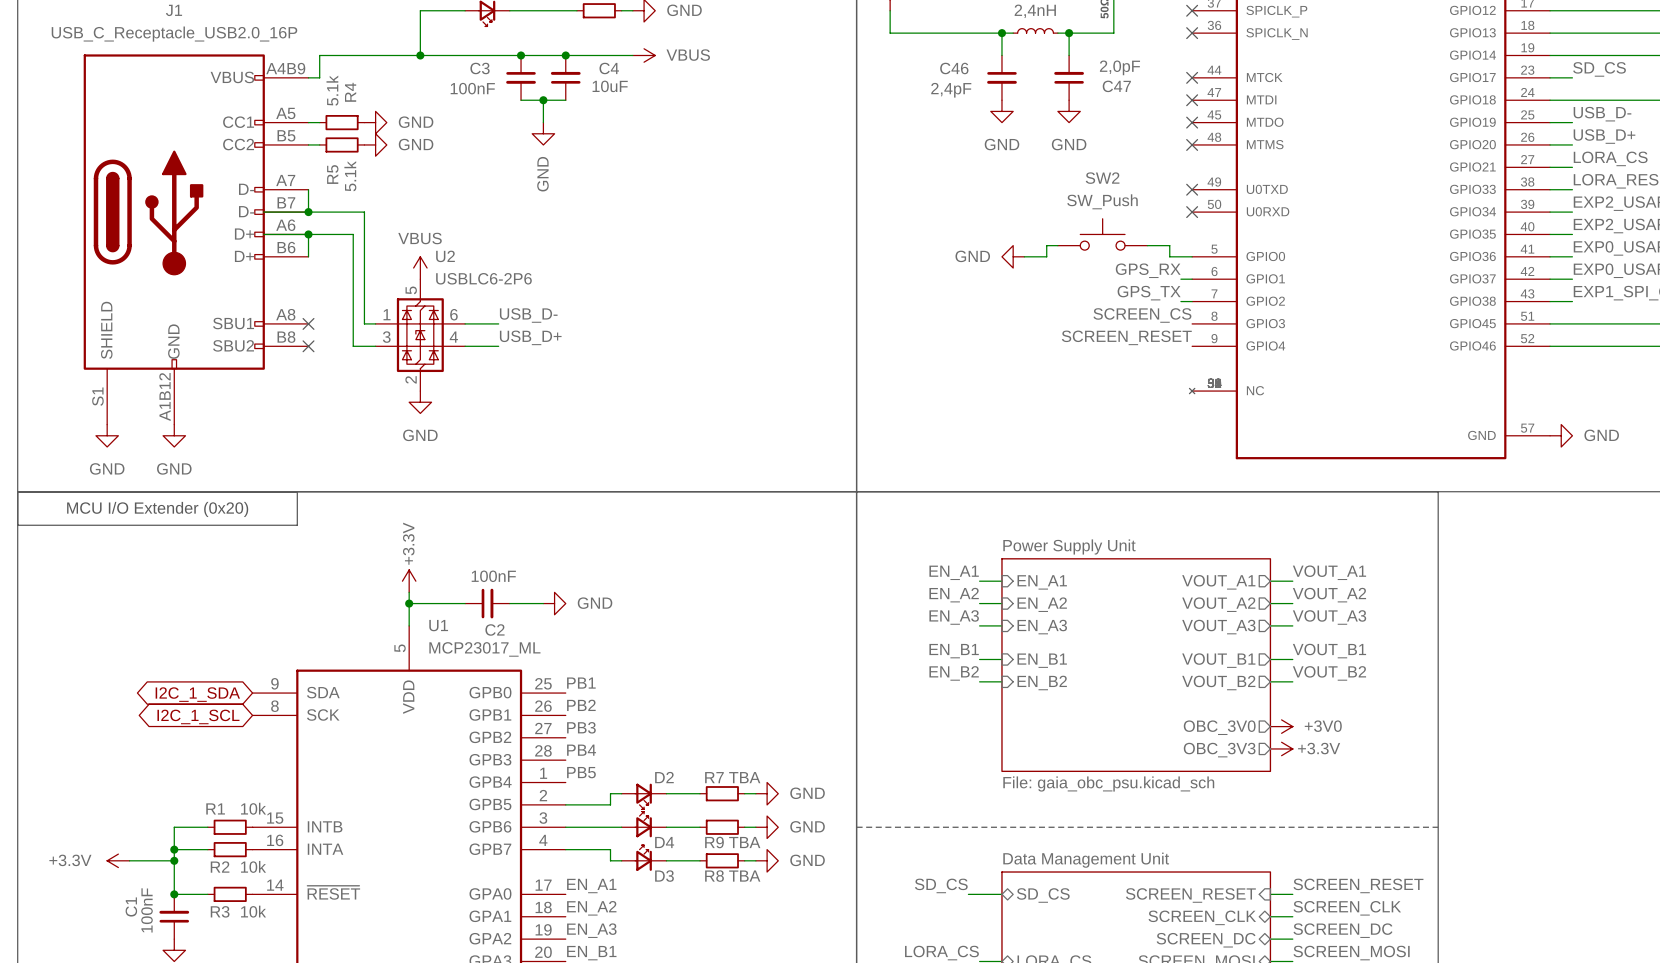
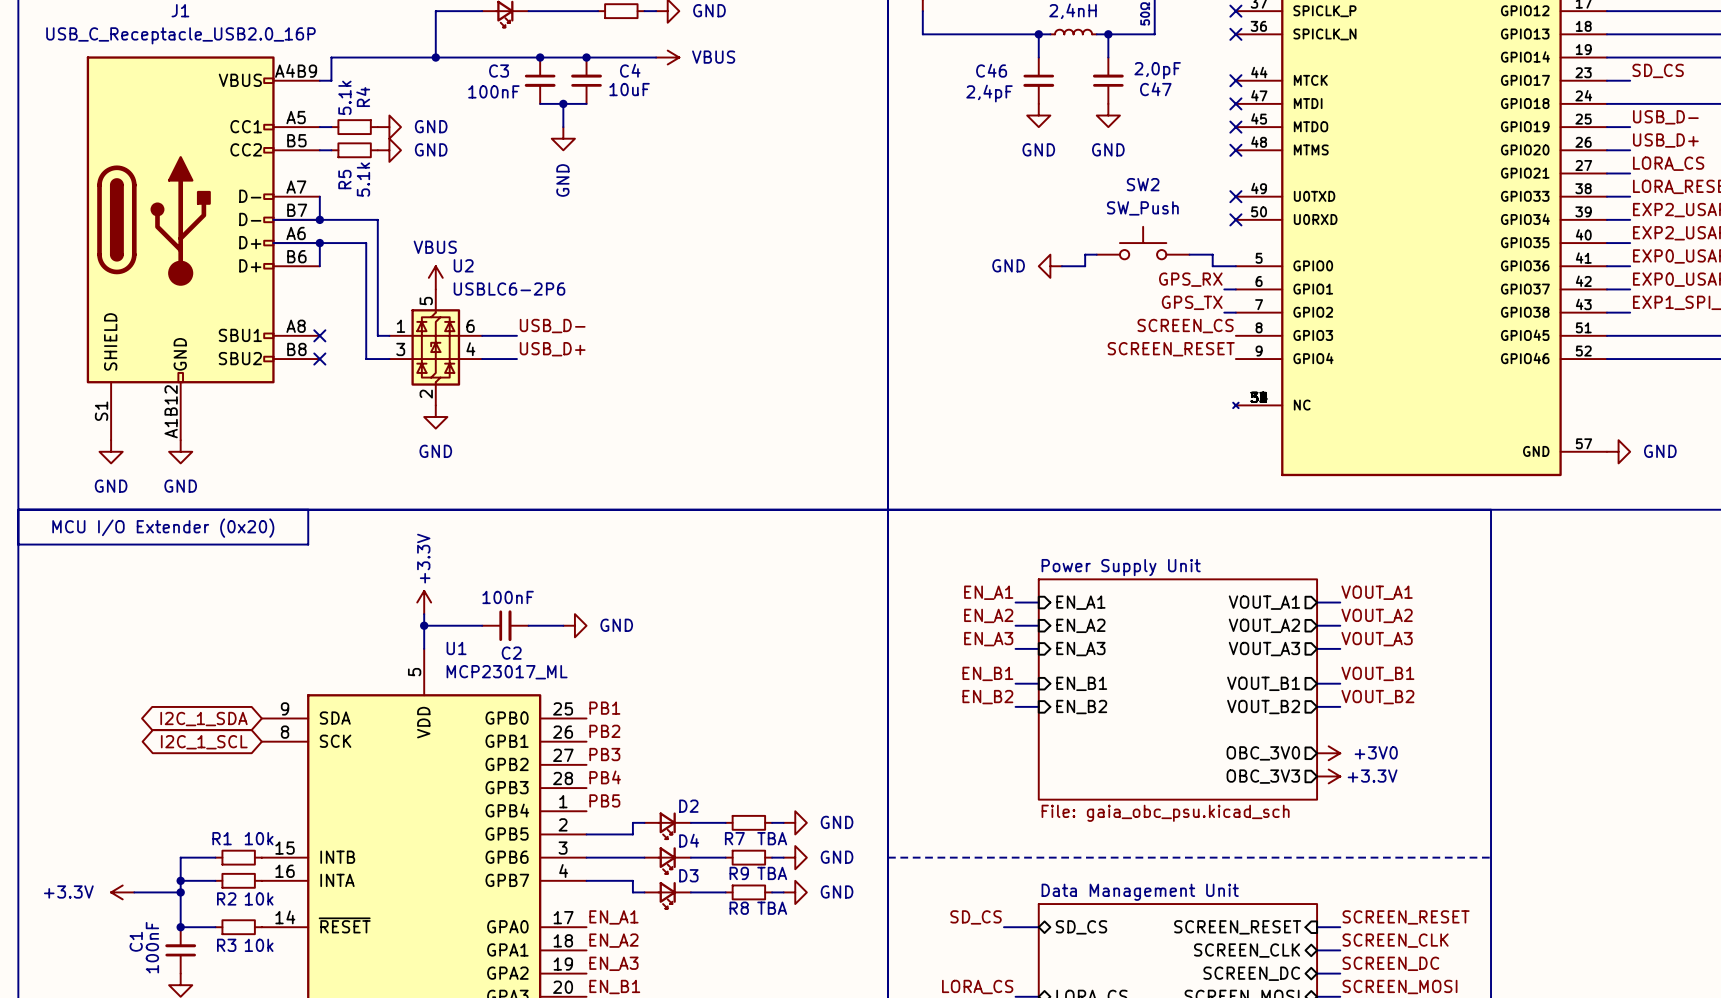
R7 name position: R7 (714, 777) -> R7 (734, 838)
R7 value position: TBA (744, 777) -> TBA (772, 838)
D4 flip: as is (643, 824) -> up-down (667, 860)
D3 flip: as is (643, 858) -> up-down (667, 895)

